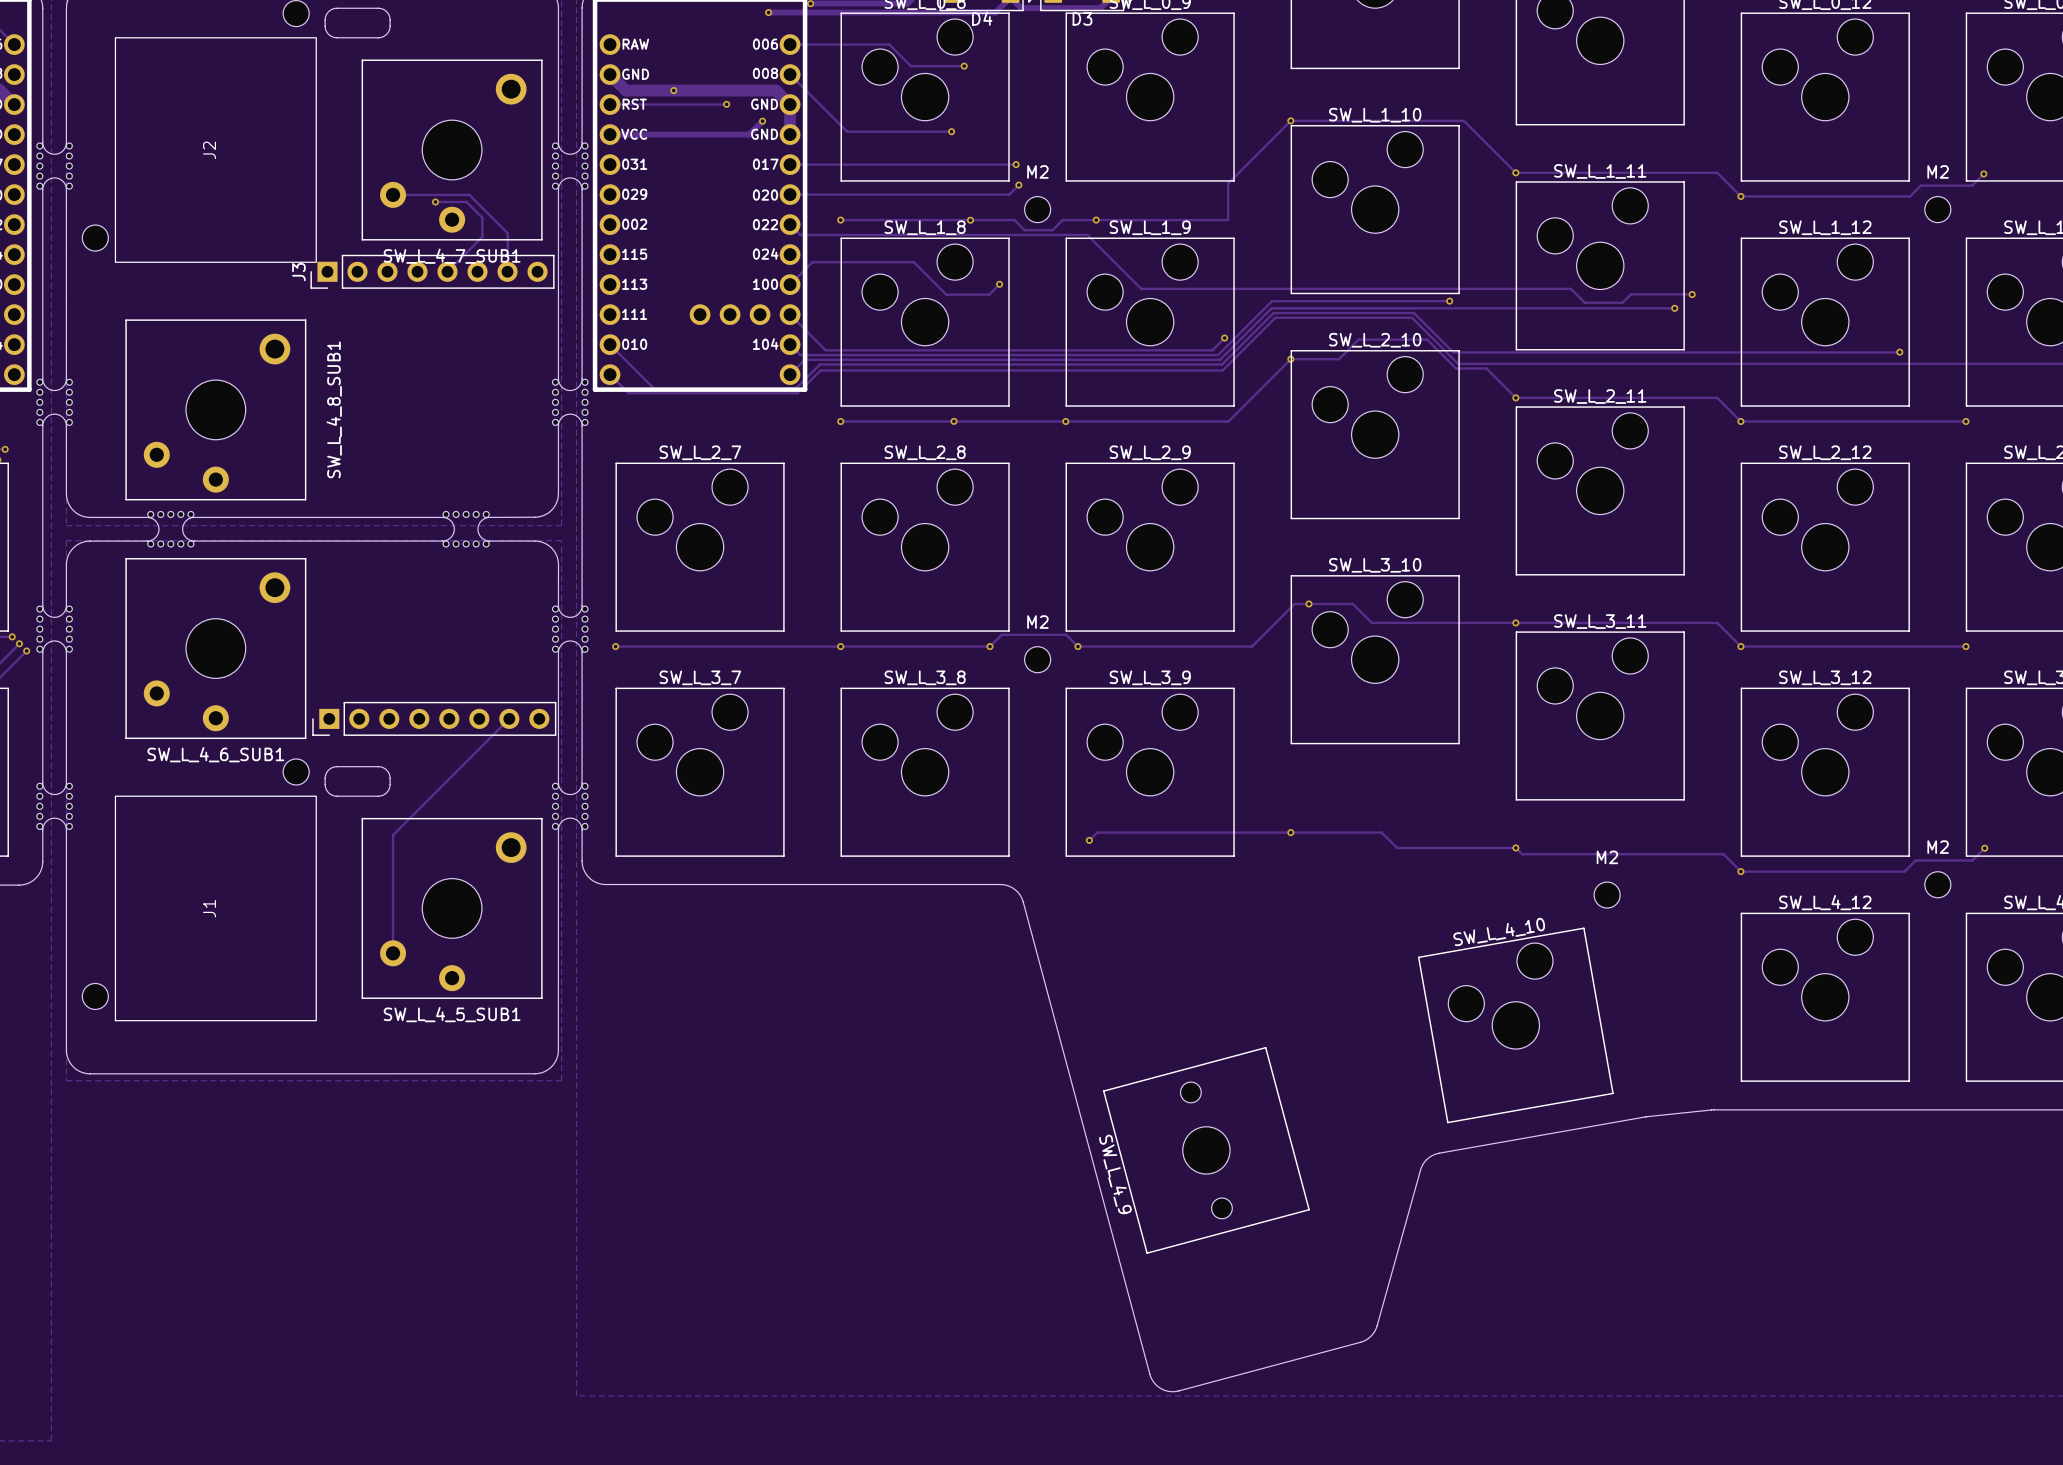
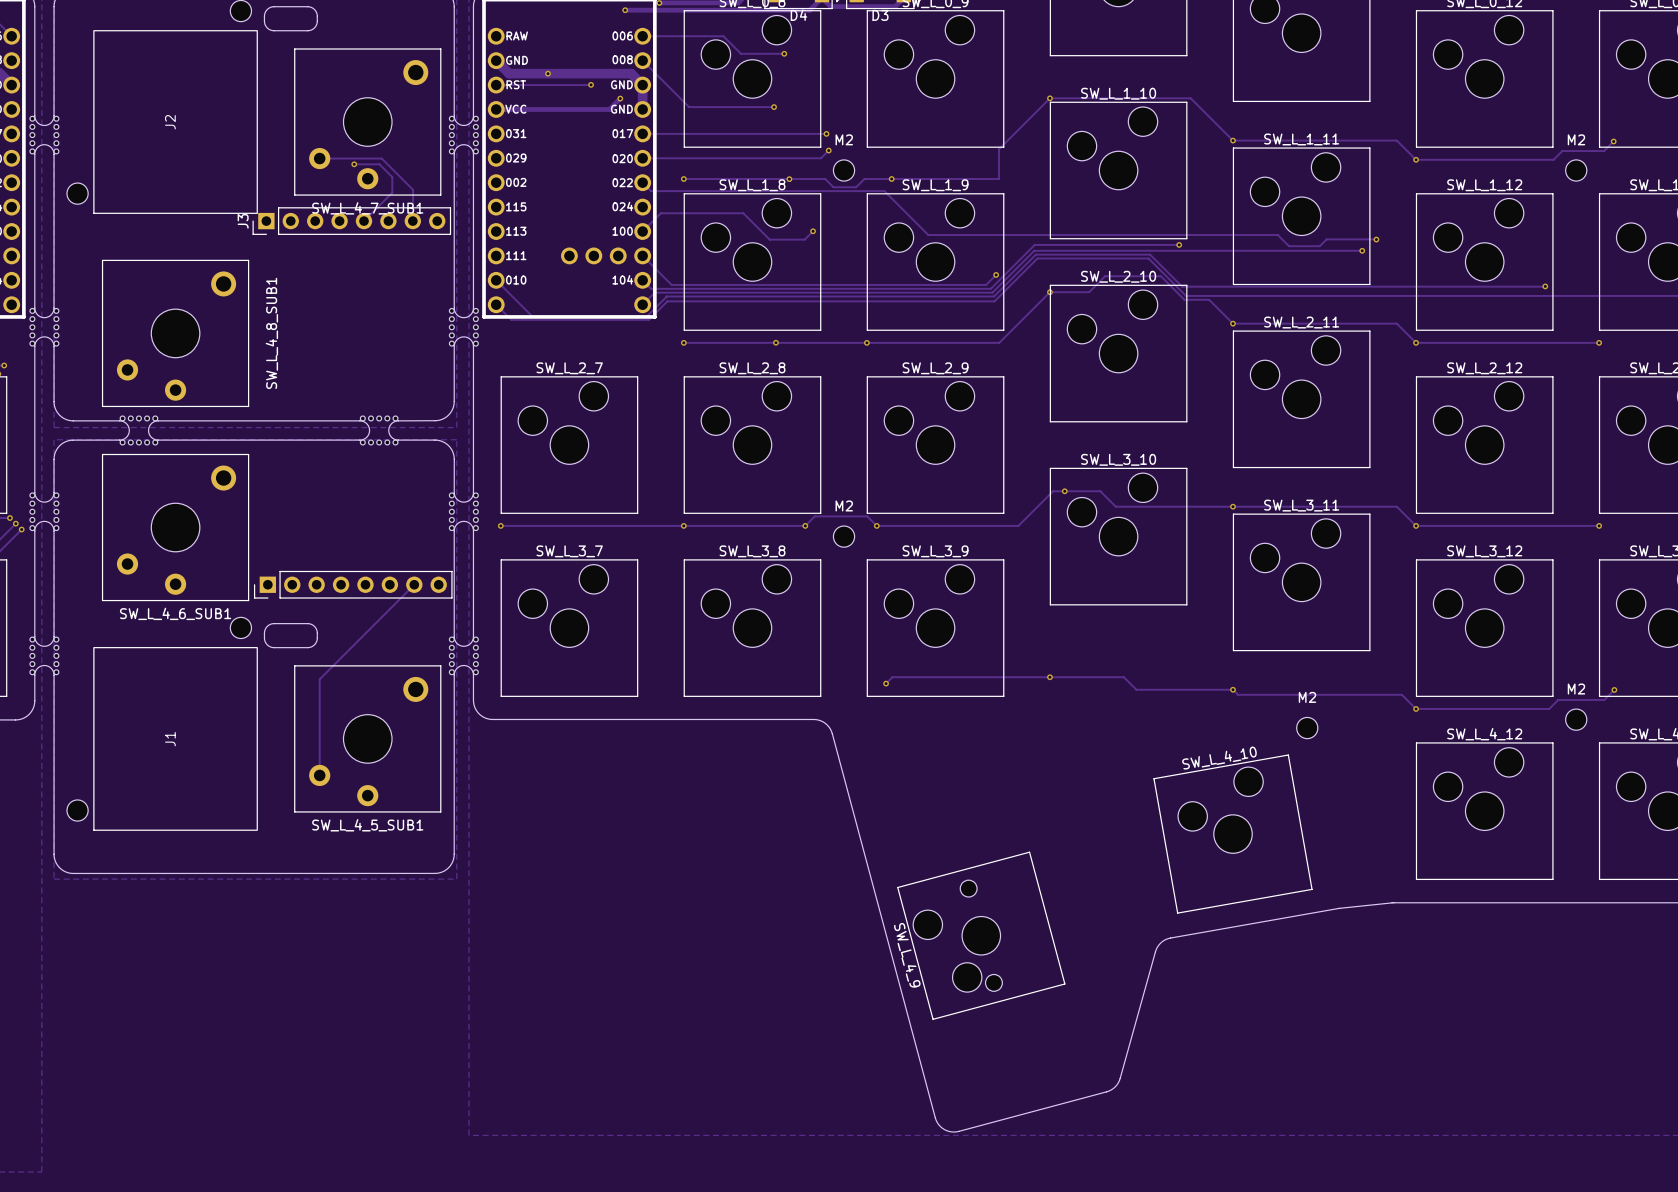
SW_L_4_9 footprint: [1102, 1046, 1310, 1254] -> [897, 851, 1066, 1020]

